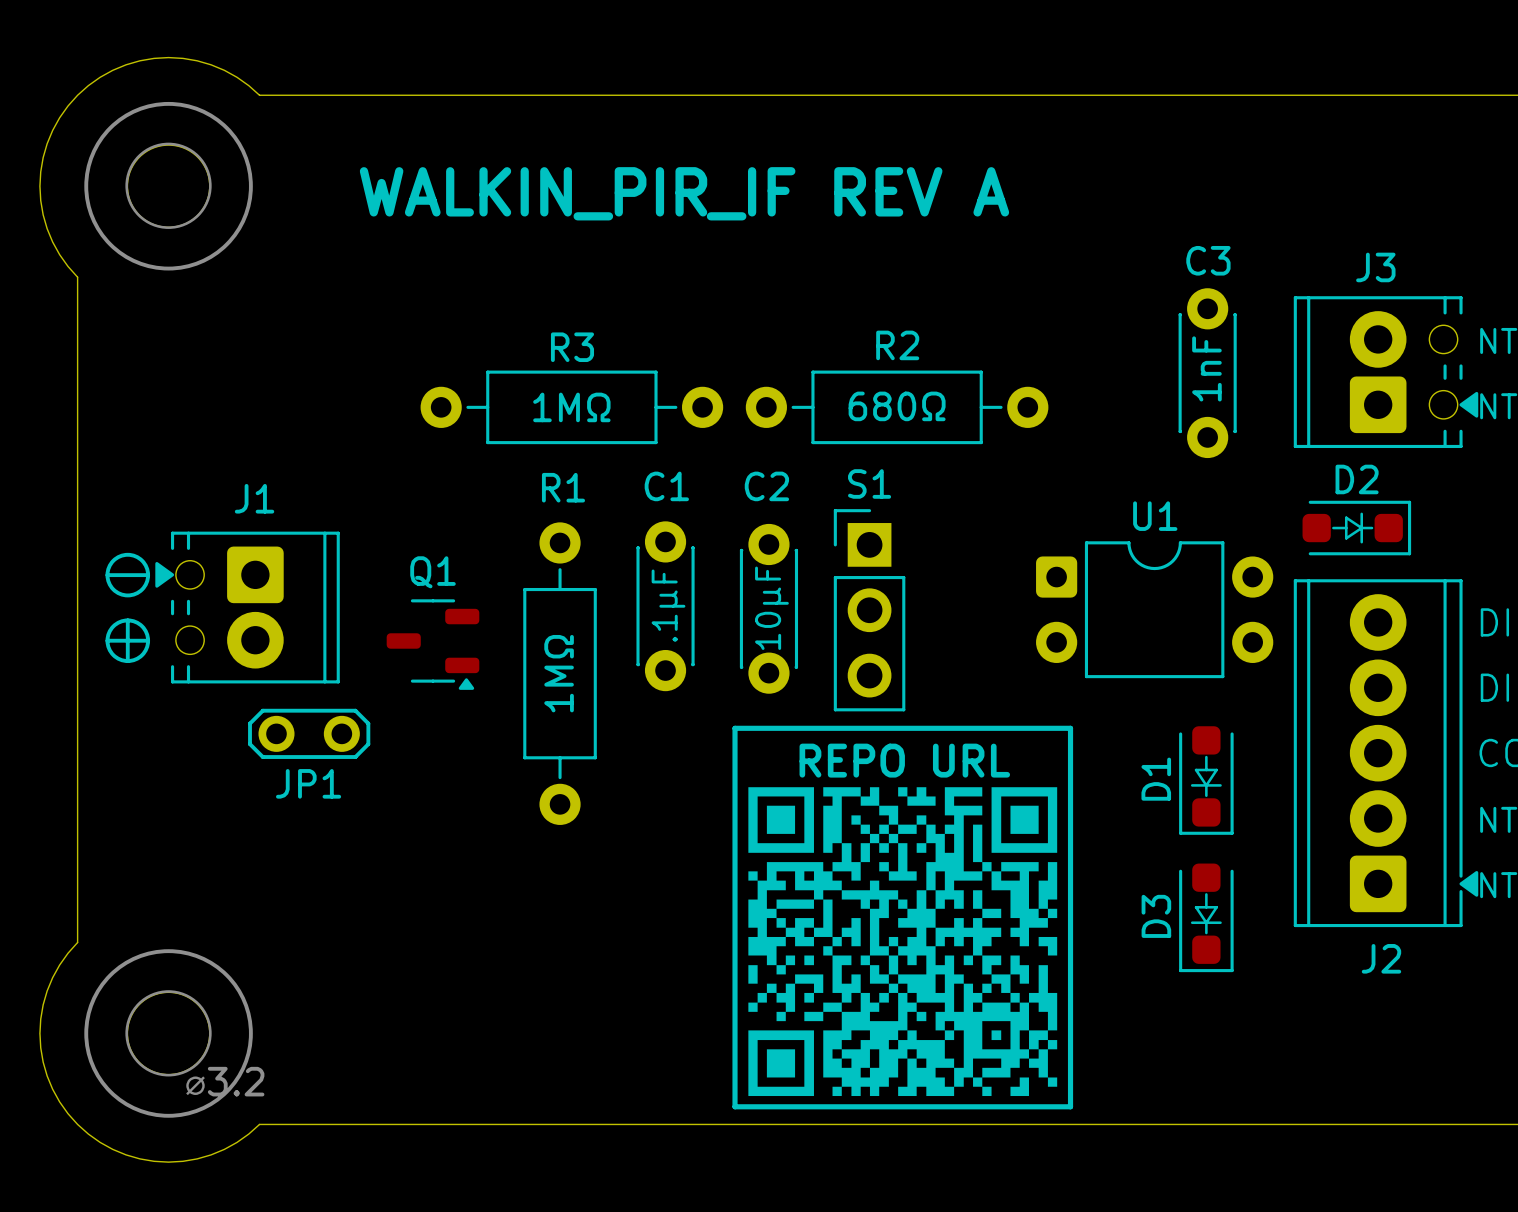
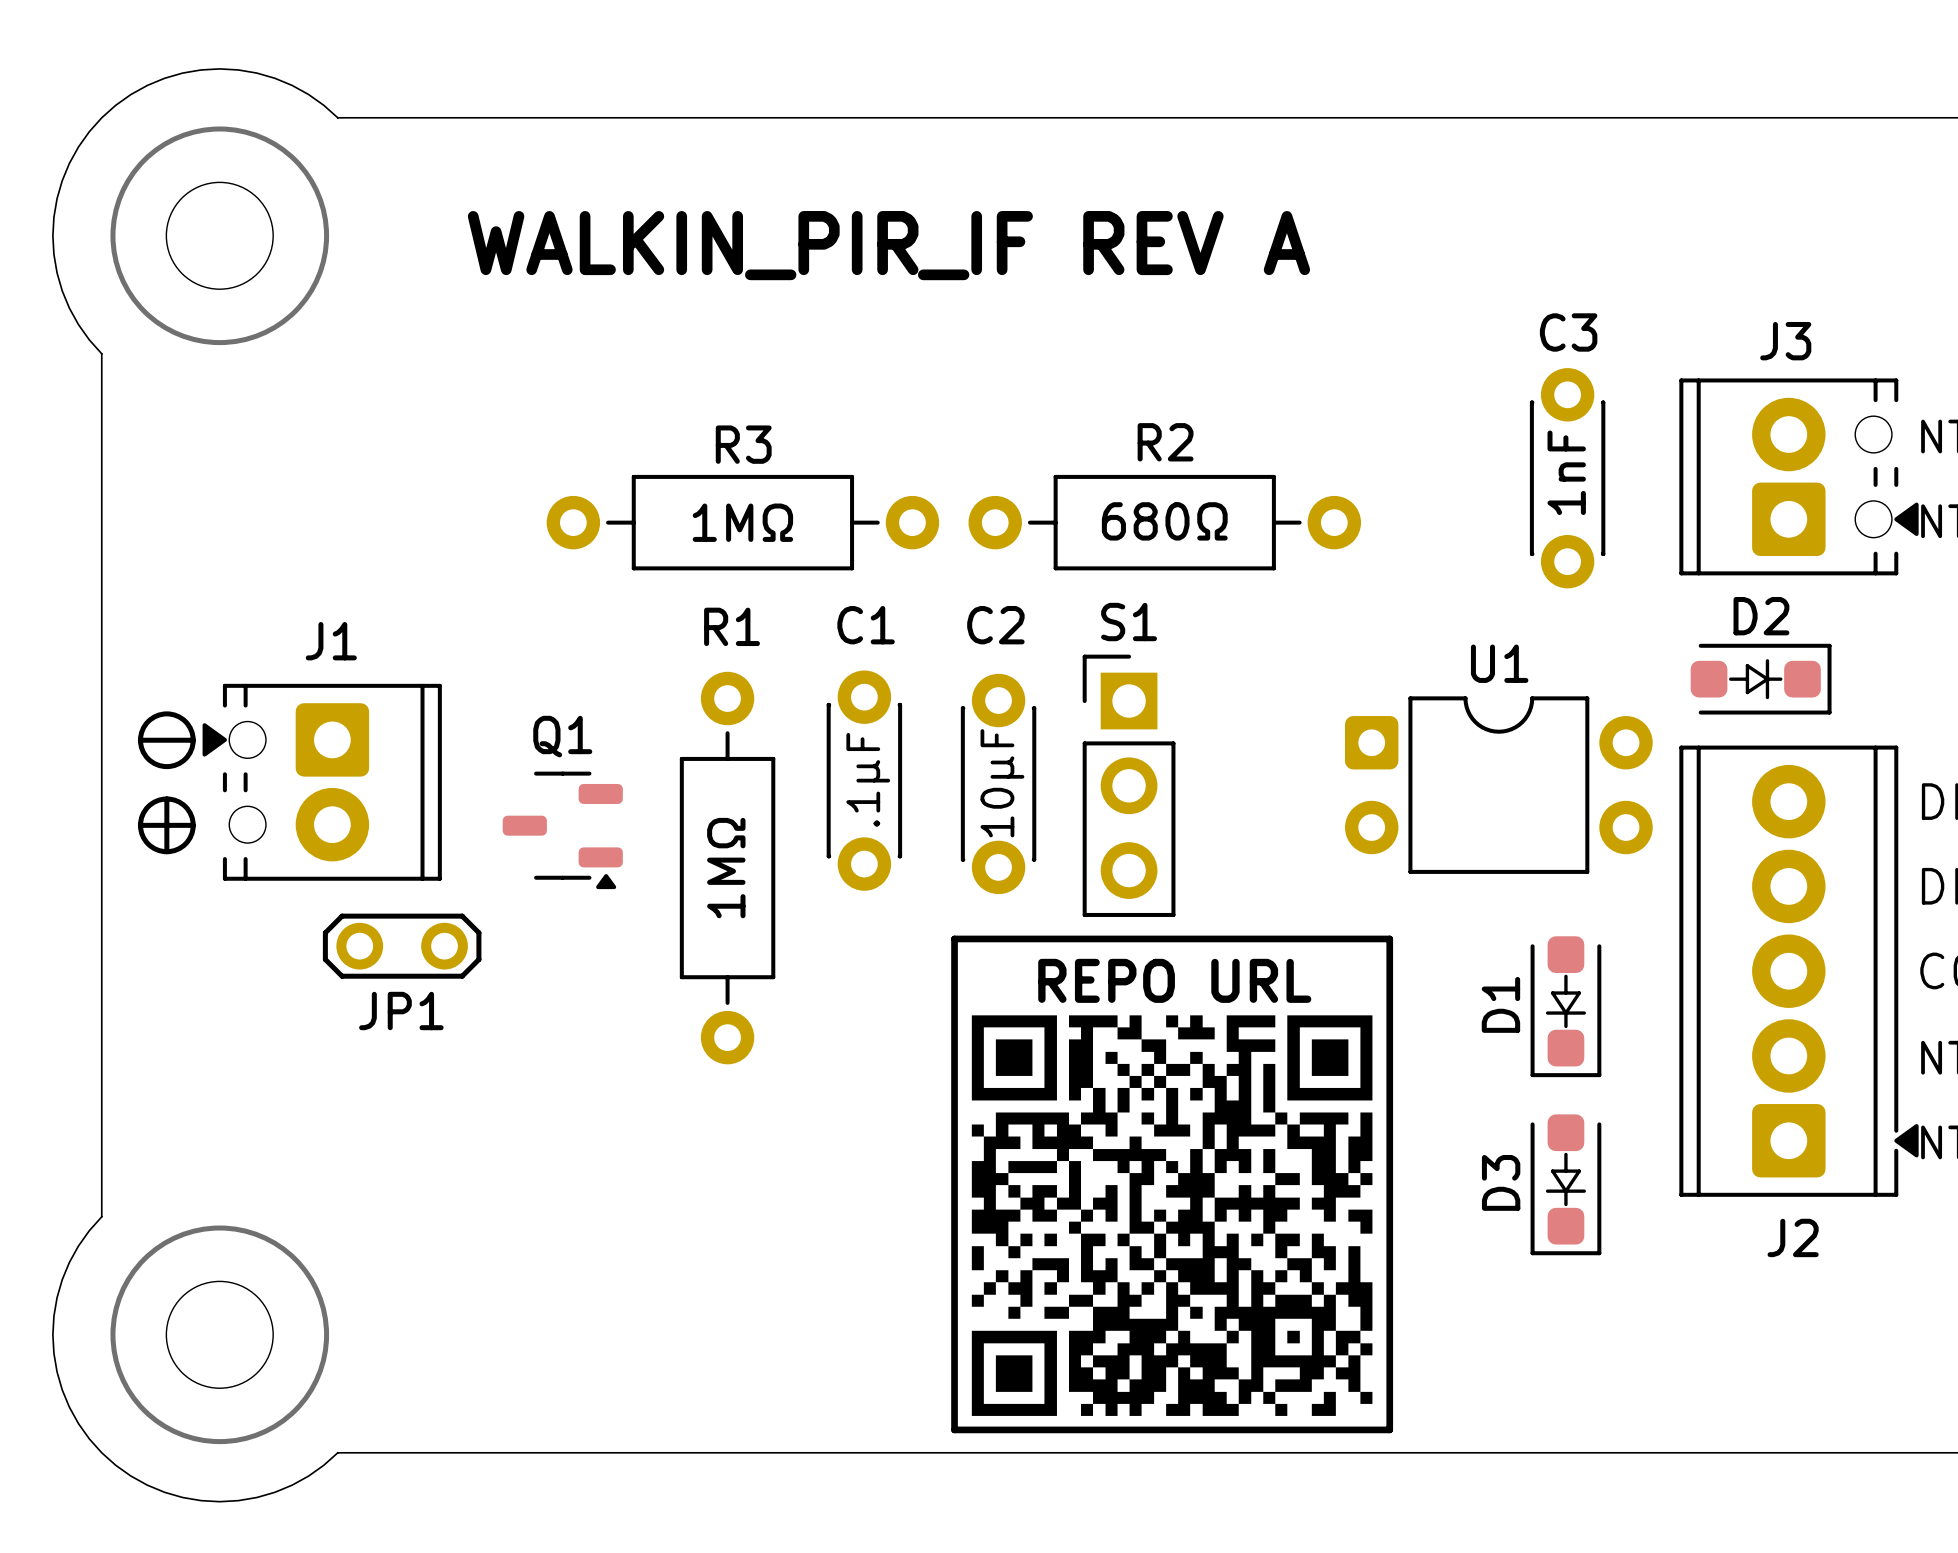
drawing: [125, 142, 212, 229] -> none
drawing: [125, 990, 212, 1077] -> none
text: ⌀3.2 (224, 1081) -> none

